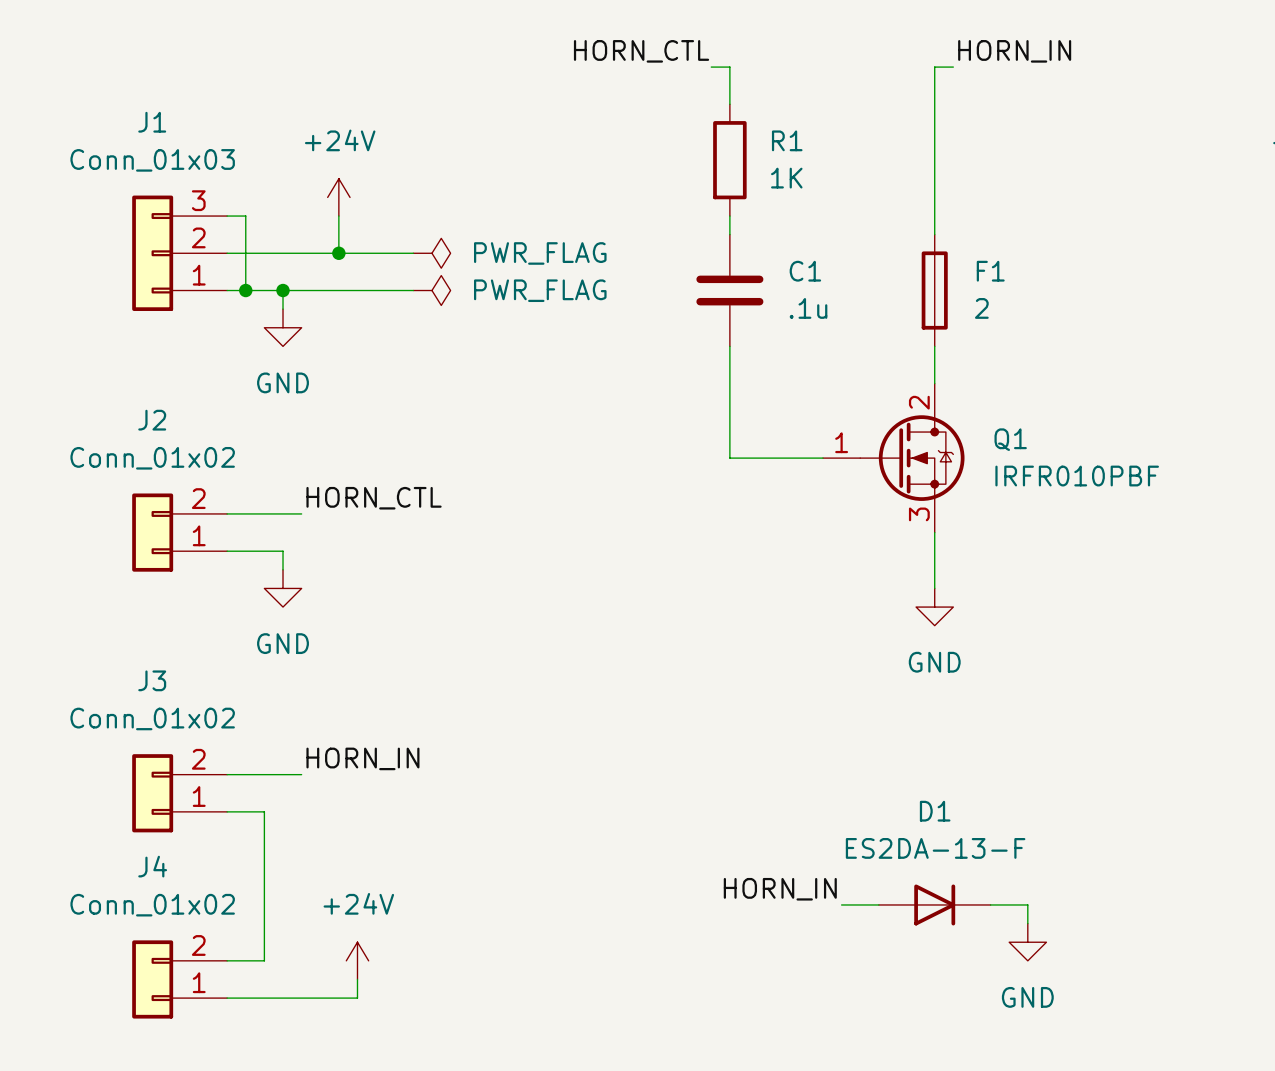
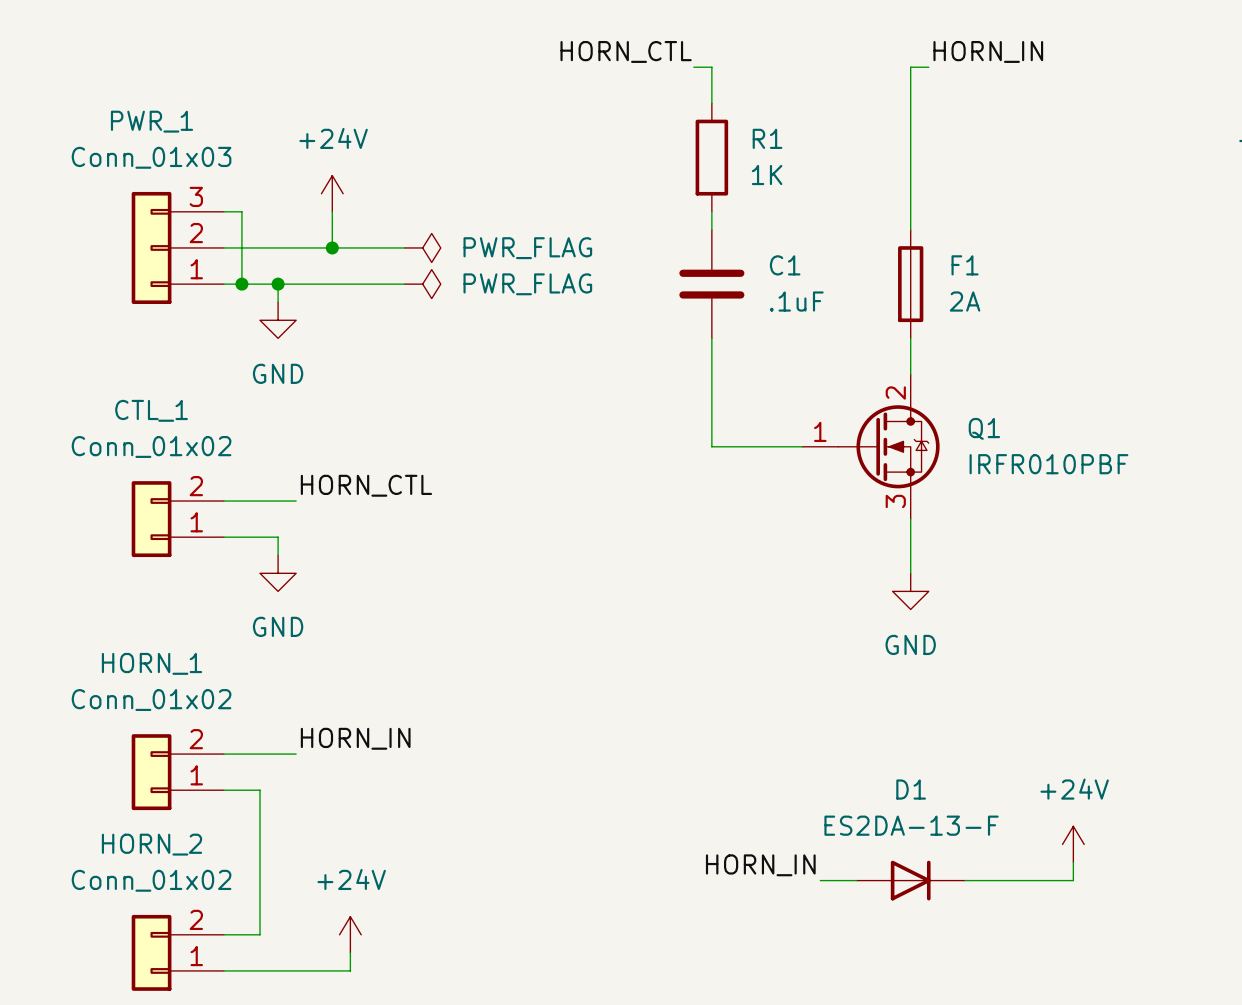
J1 name: J1 (152, 122) -> PWR_1 (151, 121)
C1 value: .1u (808, 308) -> .1uF (796, 301)
F1 value: 2 (981, 308) -> 2A (965, 301)
J2 name: J2 (152, 420) -> CTL_1 (151, 410)
J3 name: J3 (152, 680) -> HORN_1 (151, 663)
J4 name: J4 (152, 866) -> HORN_2 (151, 844)
power symbol: none -> +24V (1073, 844)
wire: (1027, 904) (1027, 923) -> (1001, 880) (1073, 880) (1073, 862)
power symbol: GND (1027, 942) -> none

